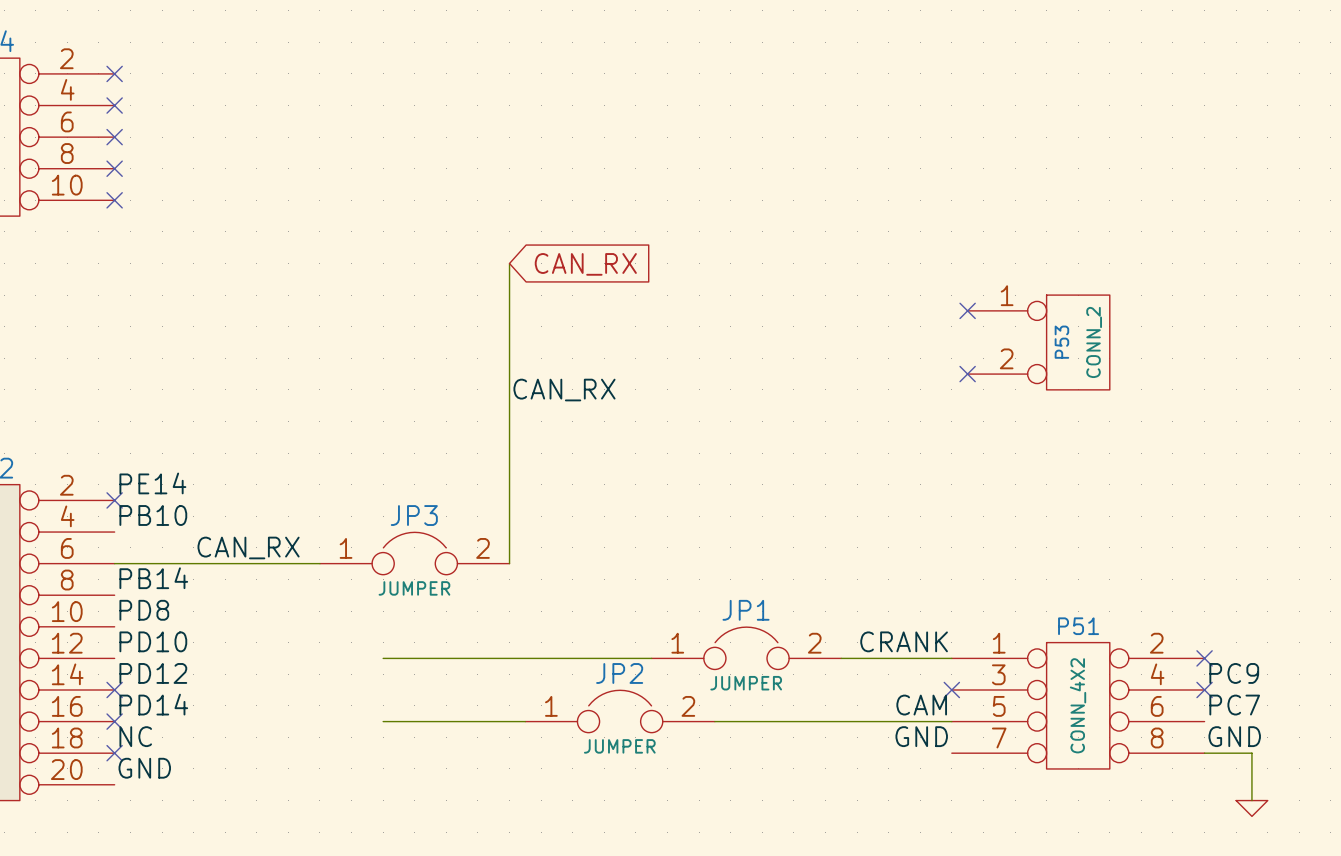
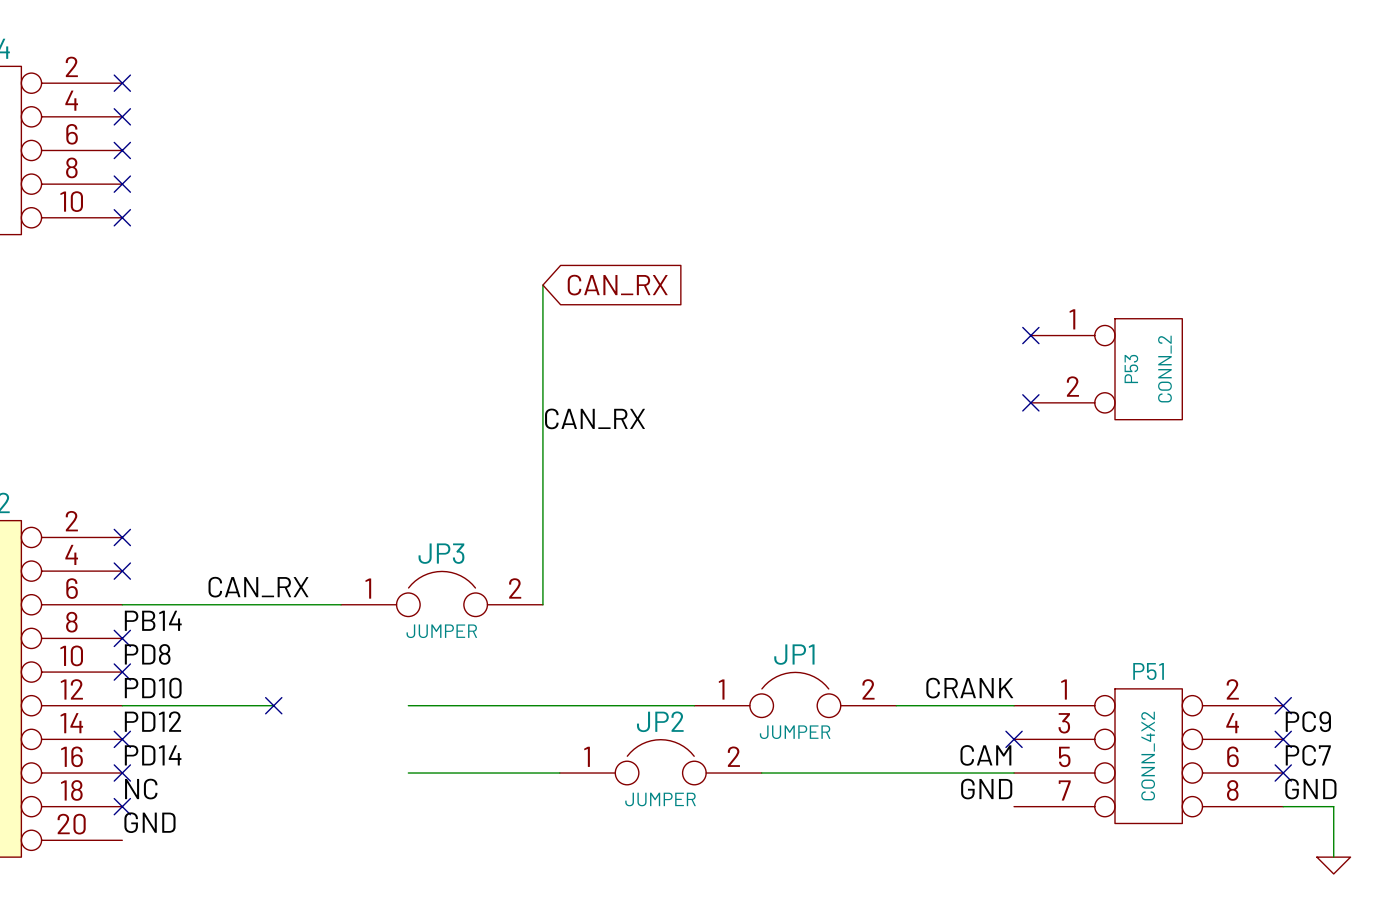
label: PE14 (152, 483) -> none
label: PB10 (153, 515) -> none
no-connect mark: none -> (122, 571)
no-connect mark: none -> (122, 638)
no-connect mark: none -> (122, 672)
wire: none -> (122, 705) (273, 705)
no-connect mark: none -> (273, 705)
no-connect mark: none -> (1283, 773)

